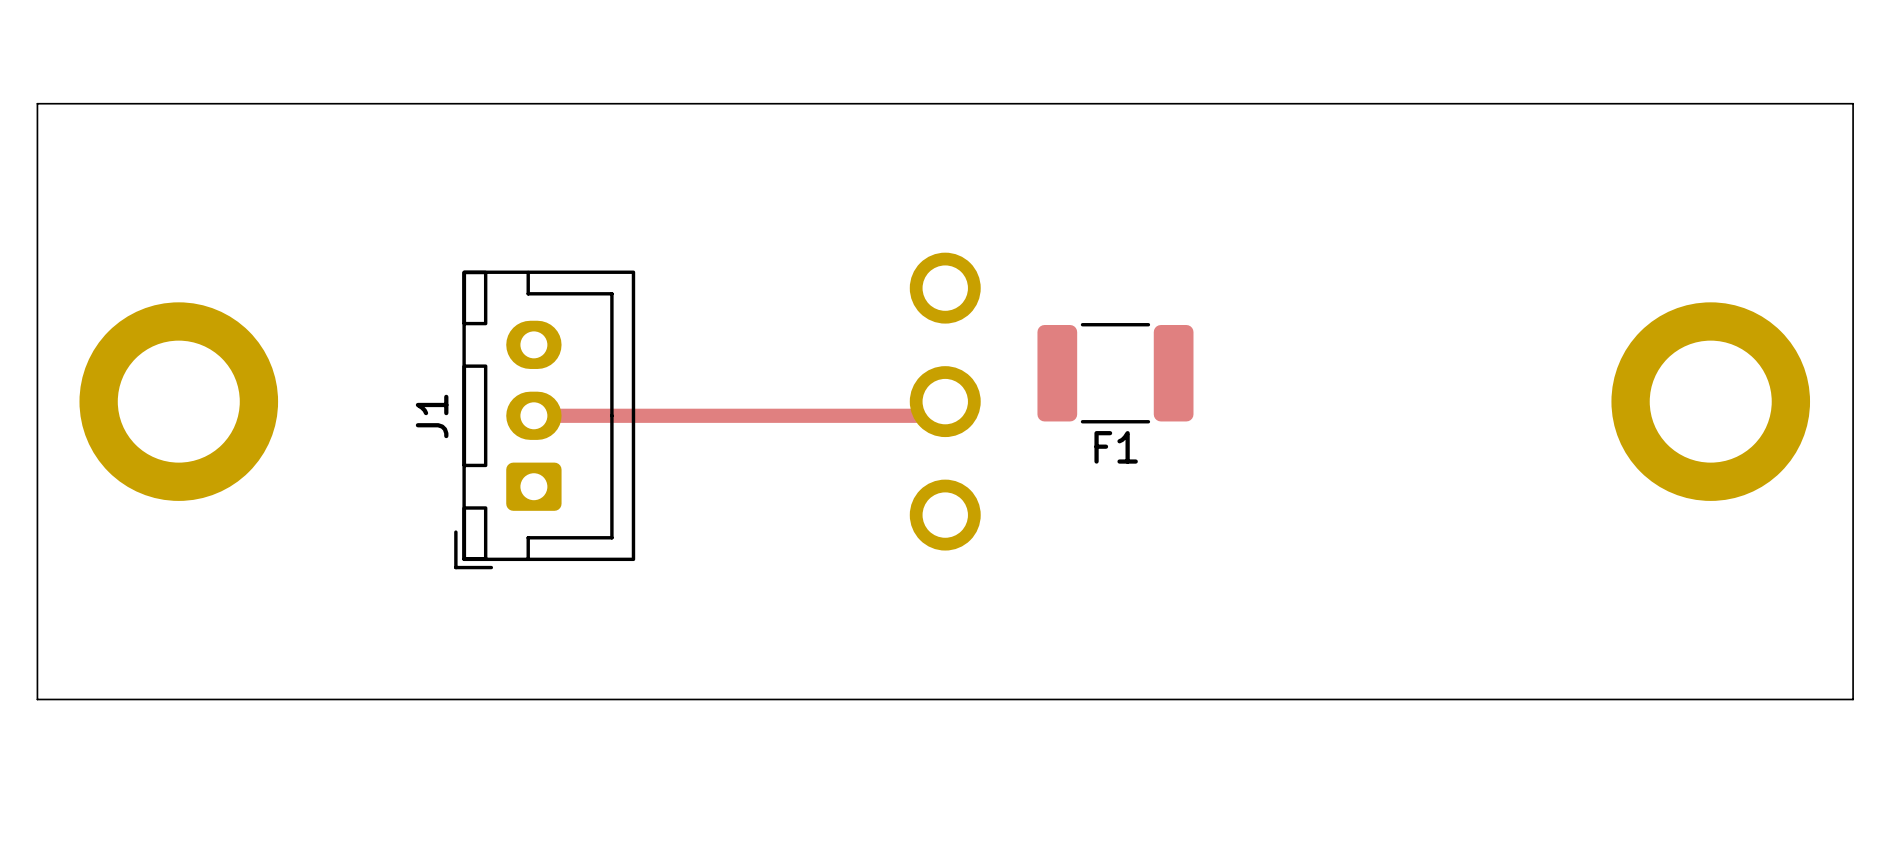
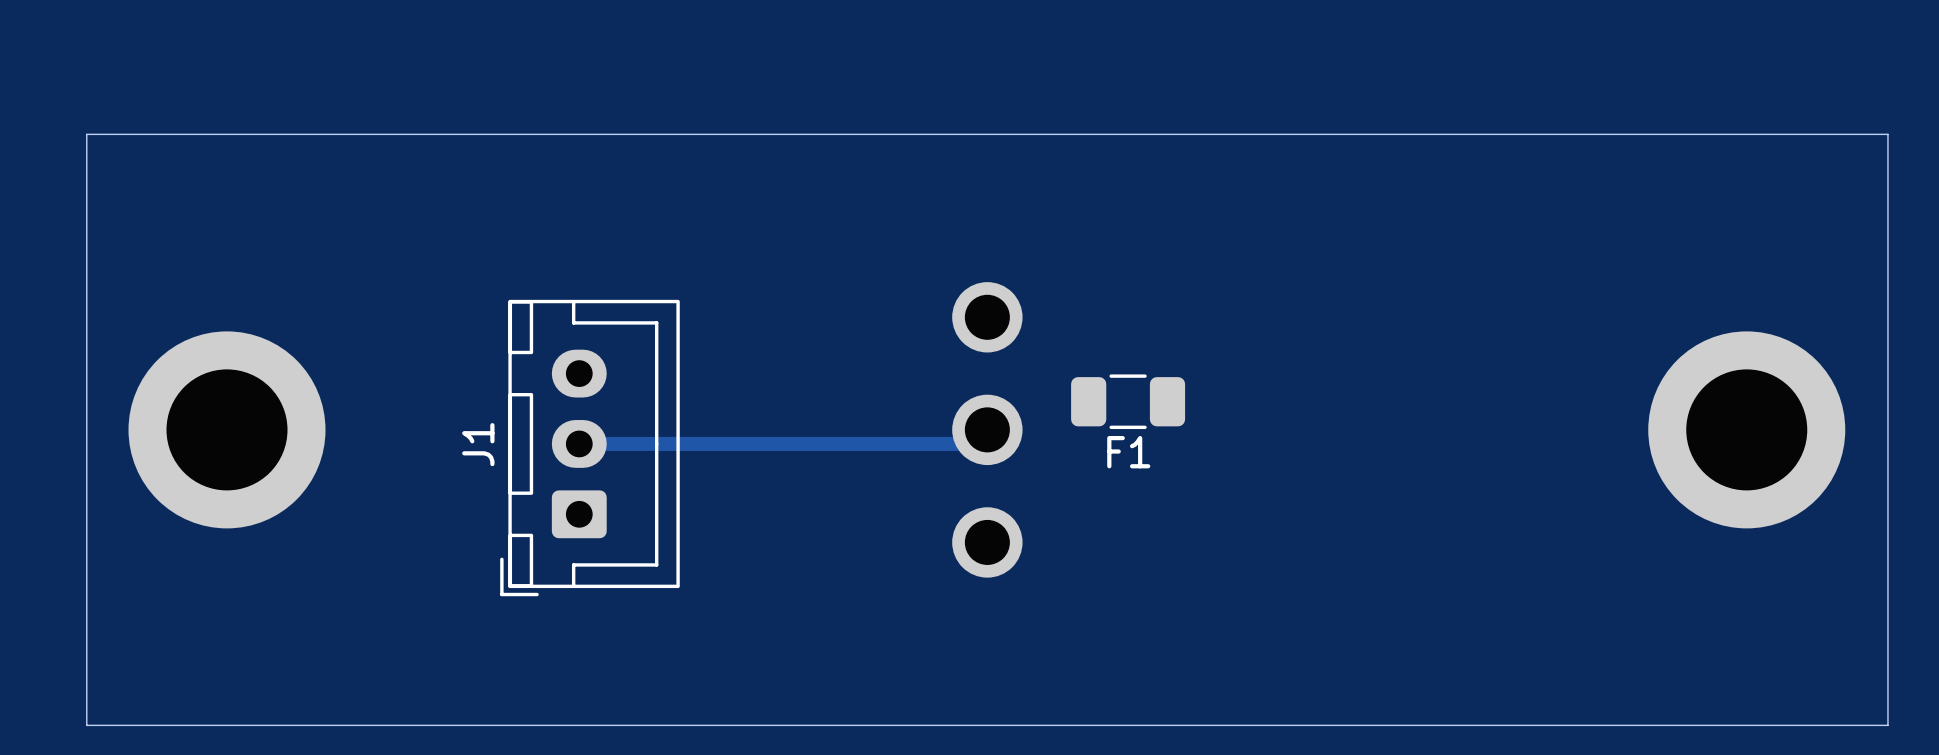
F1 footprint: [1037, 323, 1194, 424] -> [1071, 374, 1186, 430]

